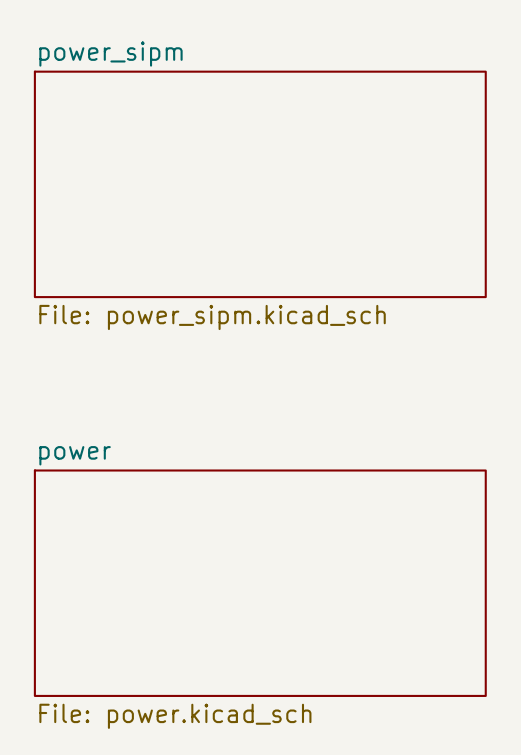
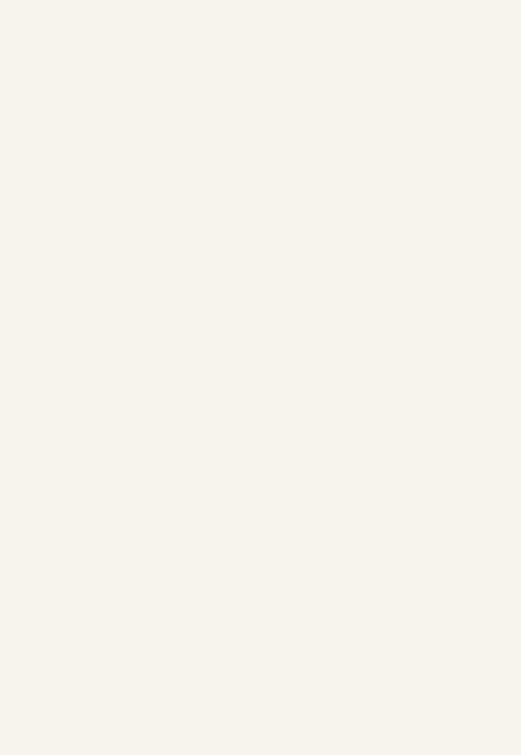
sheet power_sipm: File: power_sipm.kicad_sch (260, 184) -> none
sheet power: File: power.kicad_sch (260, 583) -> none

